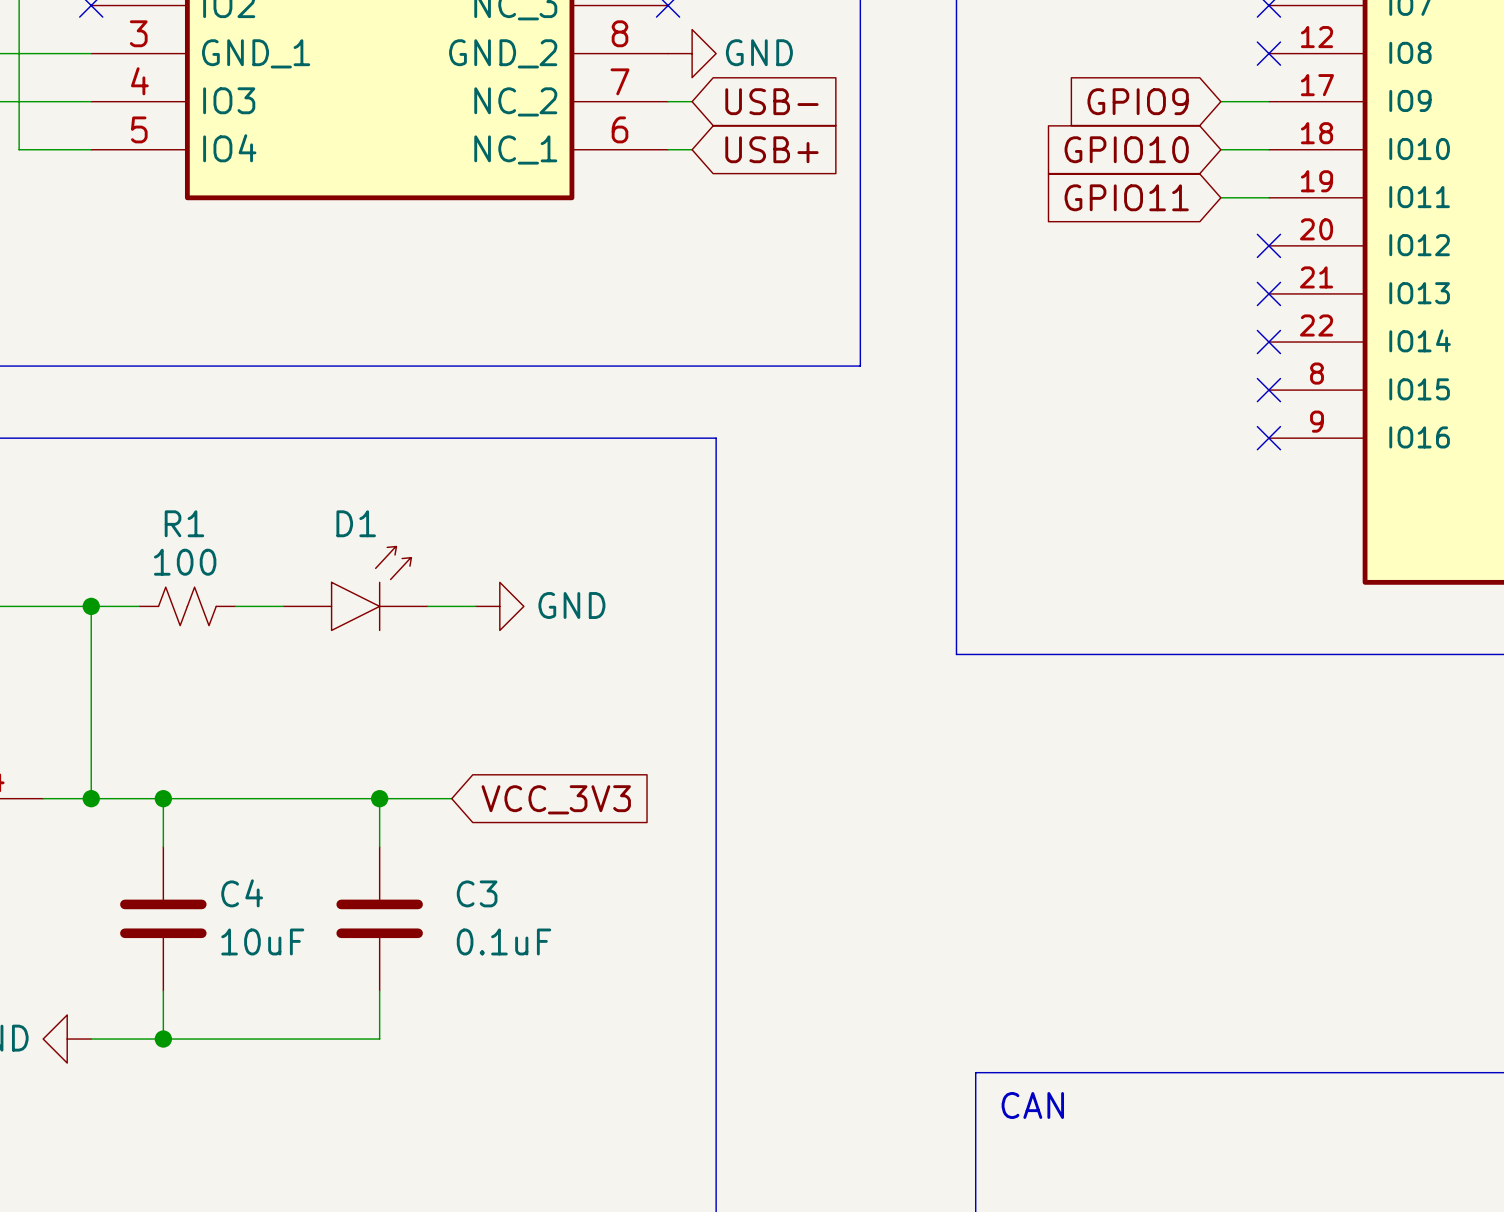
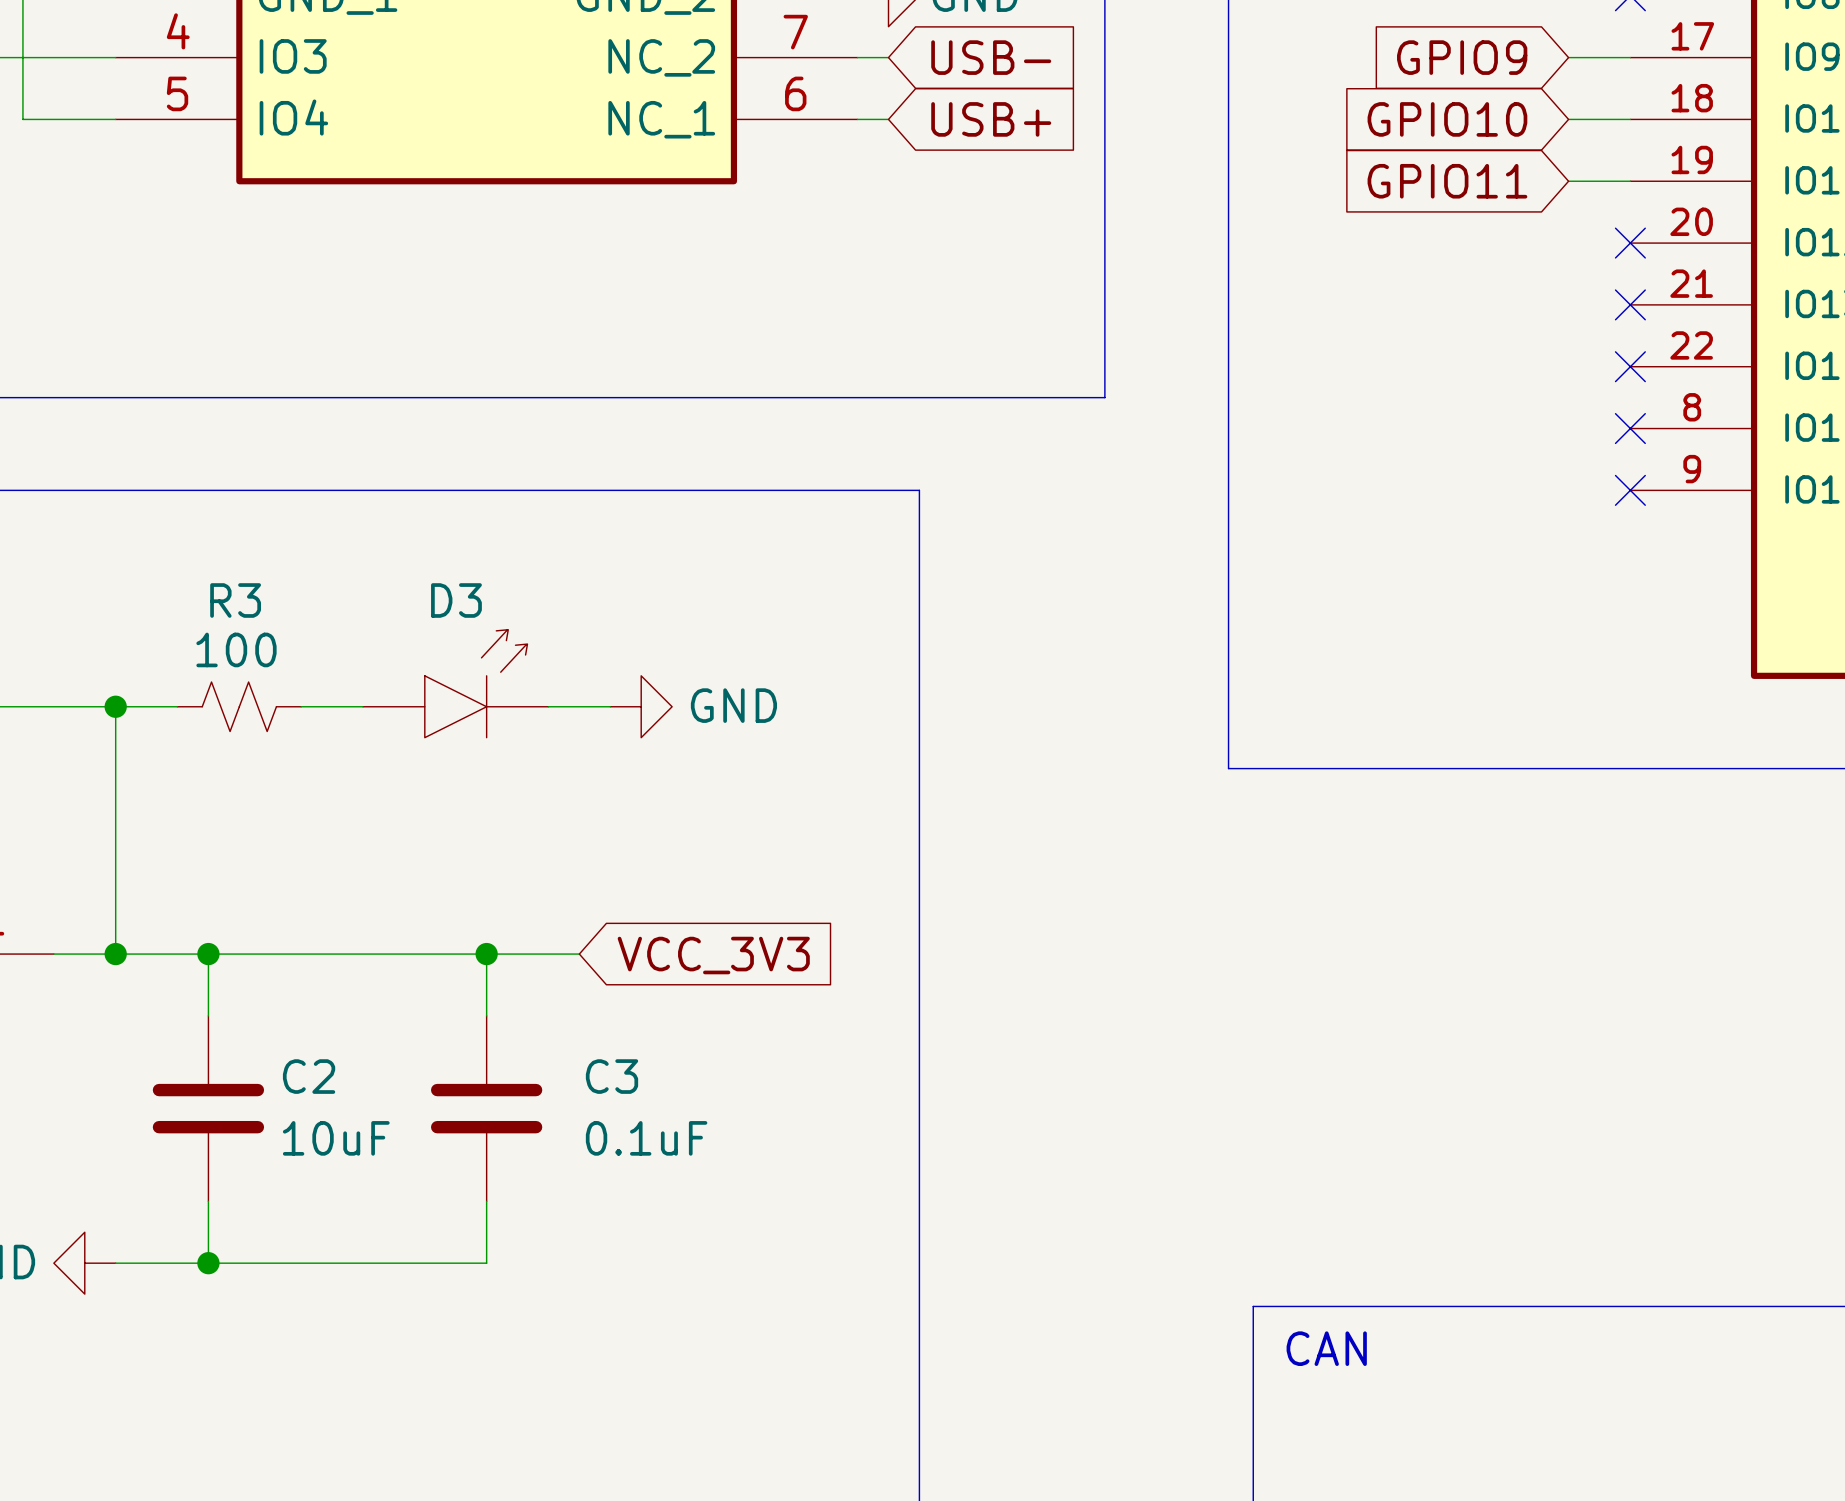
R1 name: R1 (184, 523) -> R3 (235, 600)
D1 name: D1 (356, 523) -> D3 (456, 600)
C4 name: C4 (242, 893) -> C2 (309, 1076)

